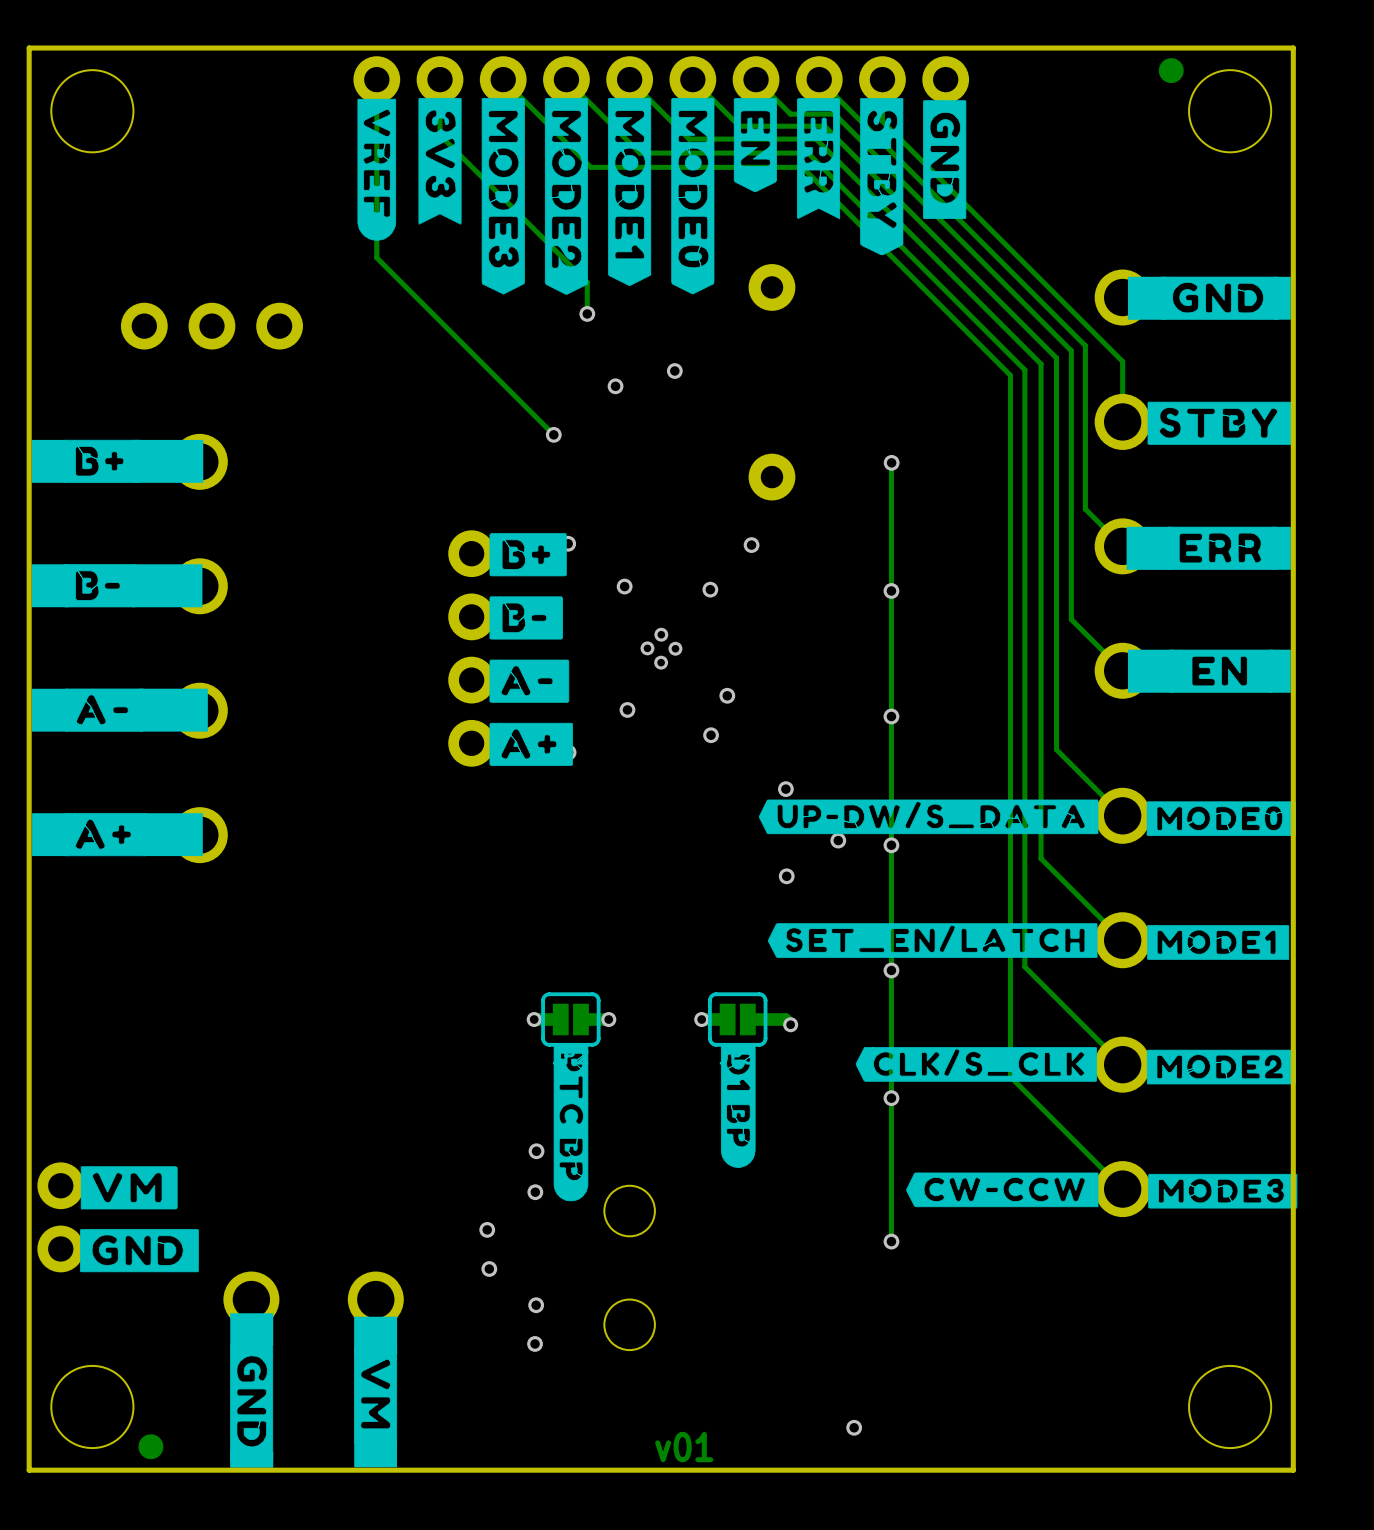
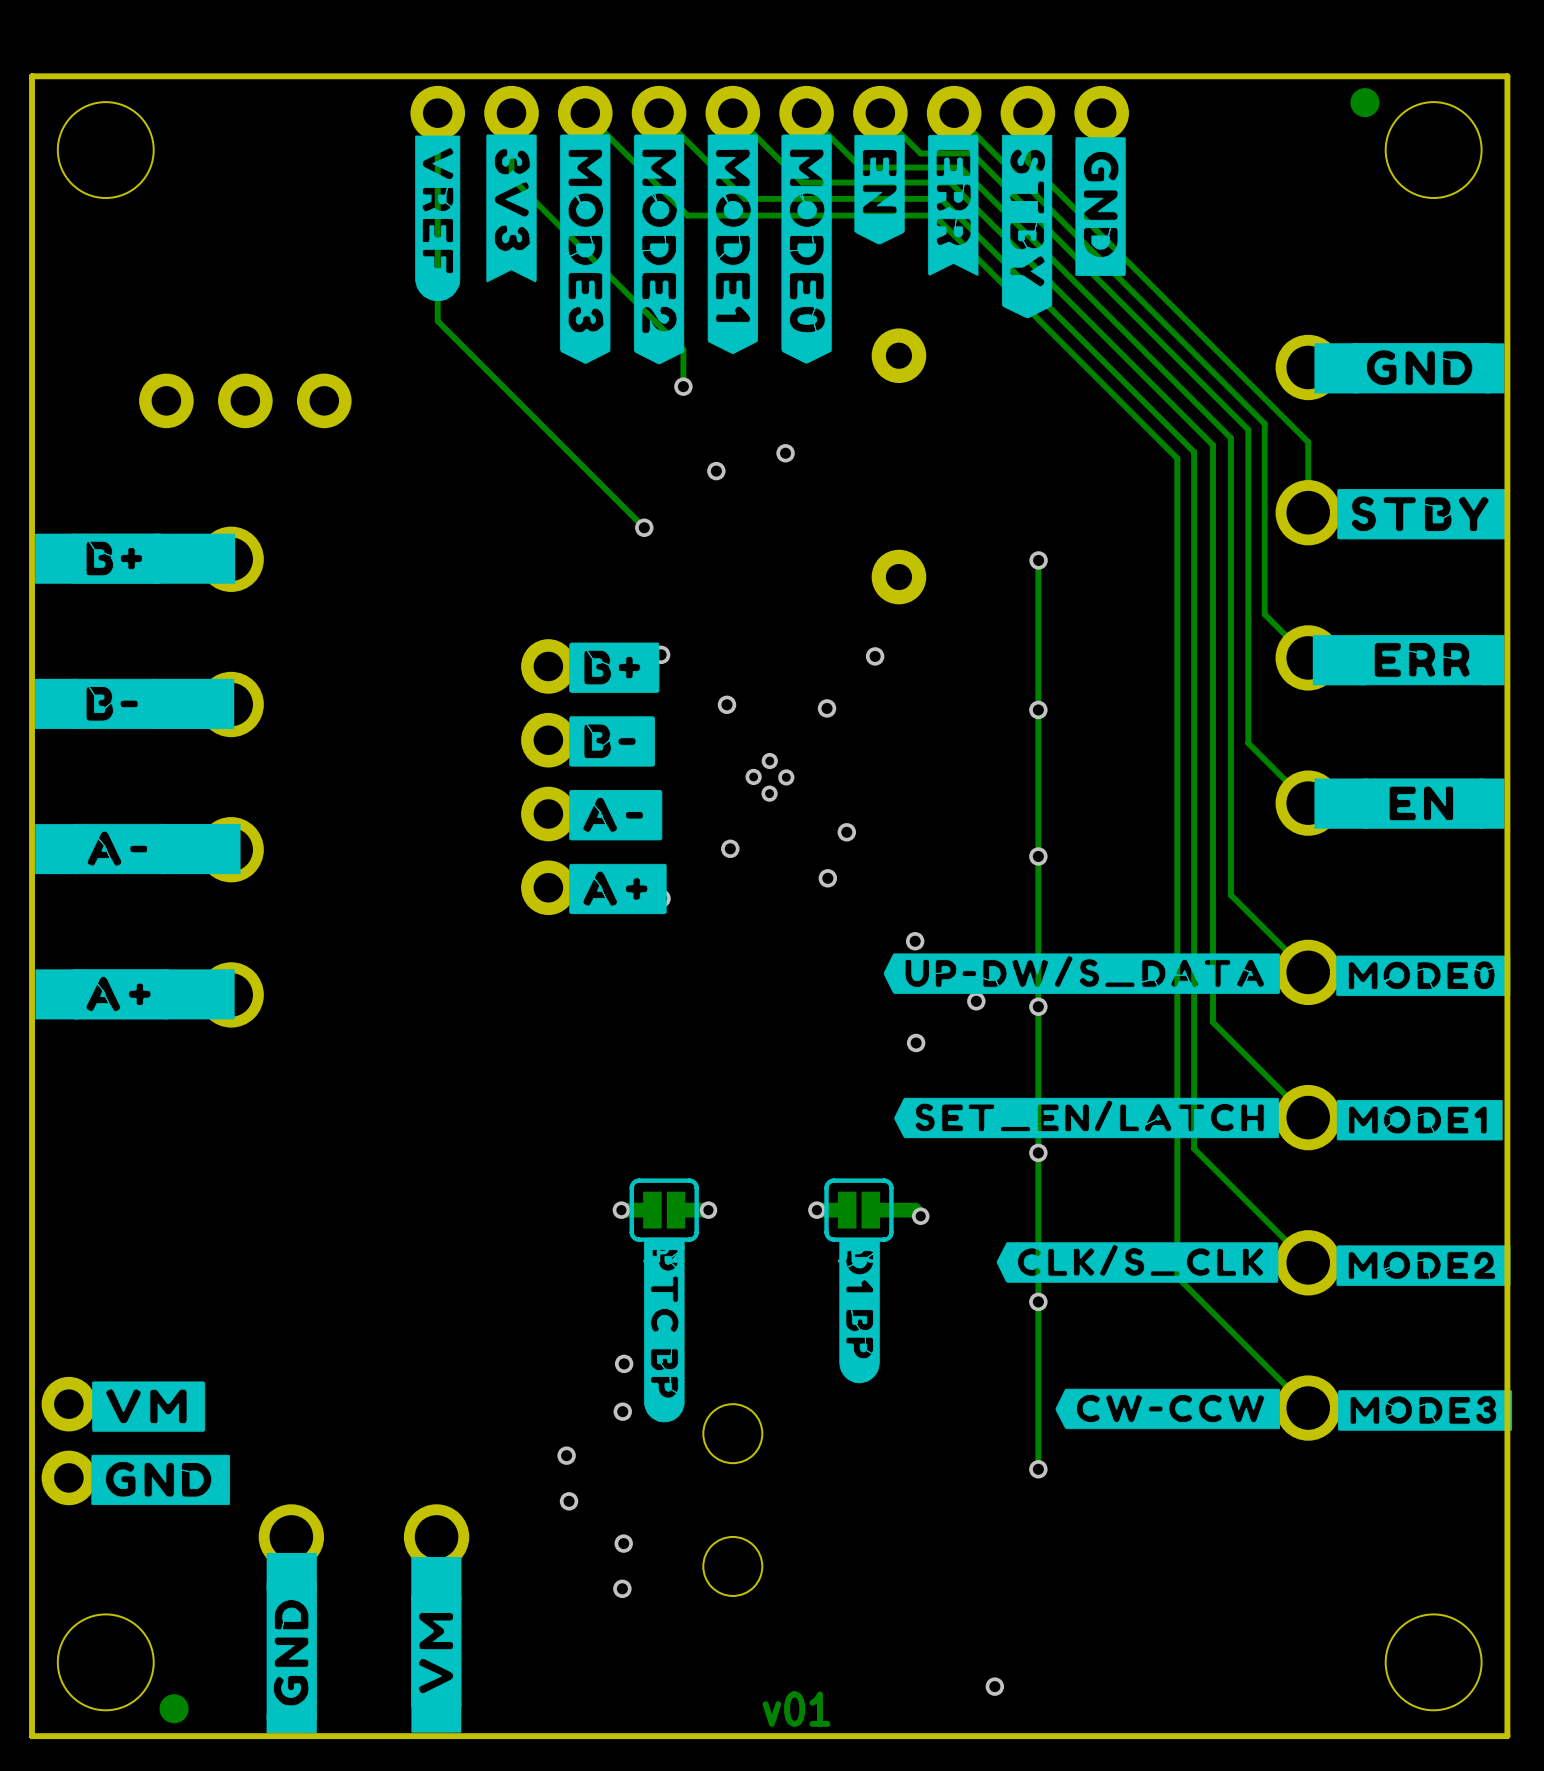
drawing shape: [230, 1343, 274, 1463] -> [266, 1581, 317, 1720]
drawing shape: [354, 1347, 398, 1445] -> [411, 1594, 462, 1708]

